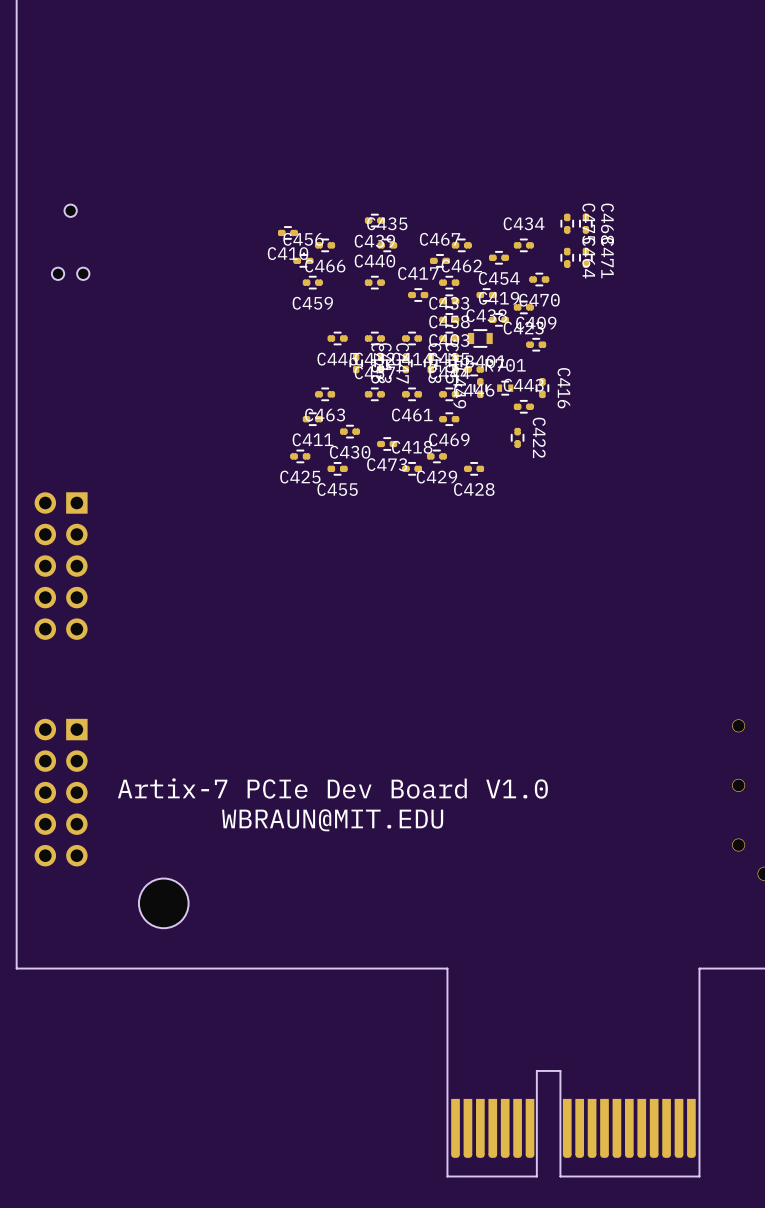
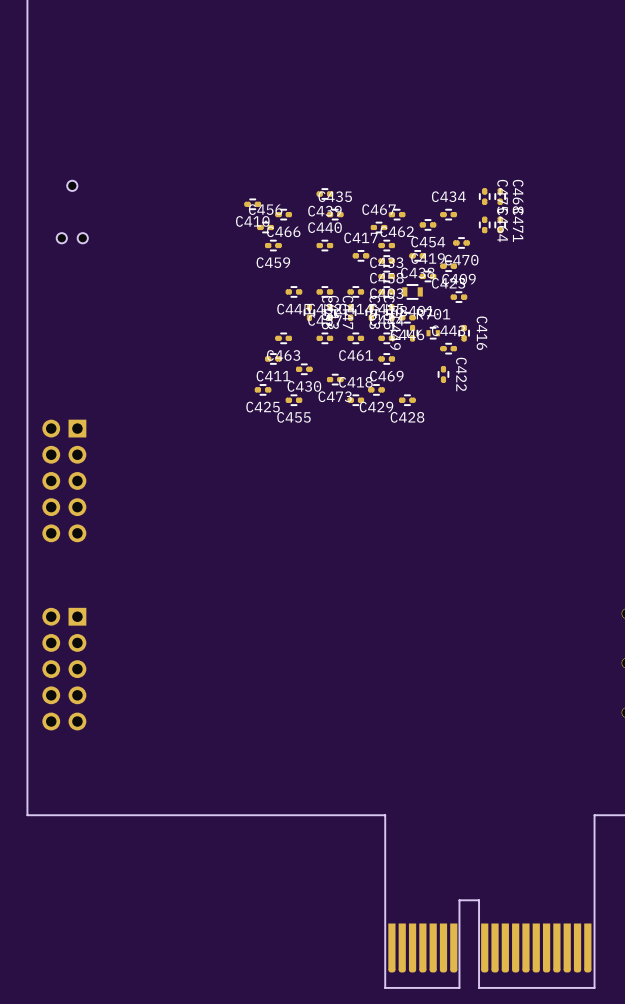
text: Artix-7 PCIe Dev Board V1.0 (332, 788) -> none
text: WBRAUN@MIT.EDU (332, 820) -> none
part: (163, 903) -> none

